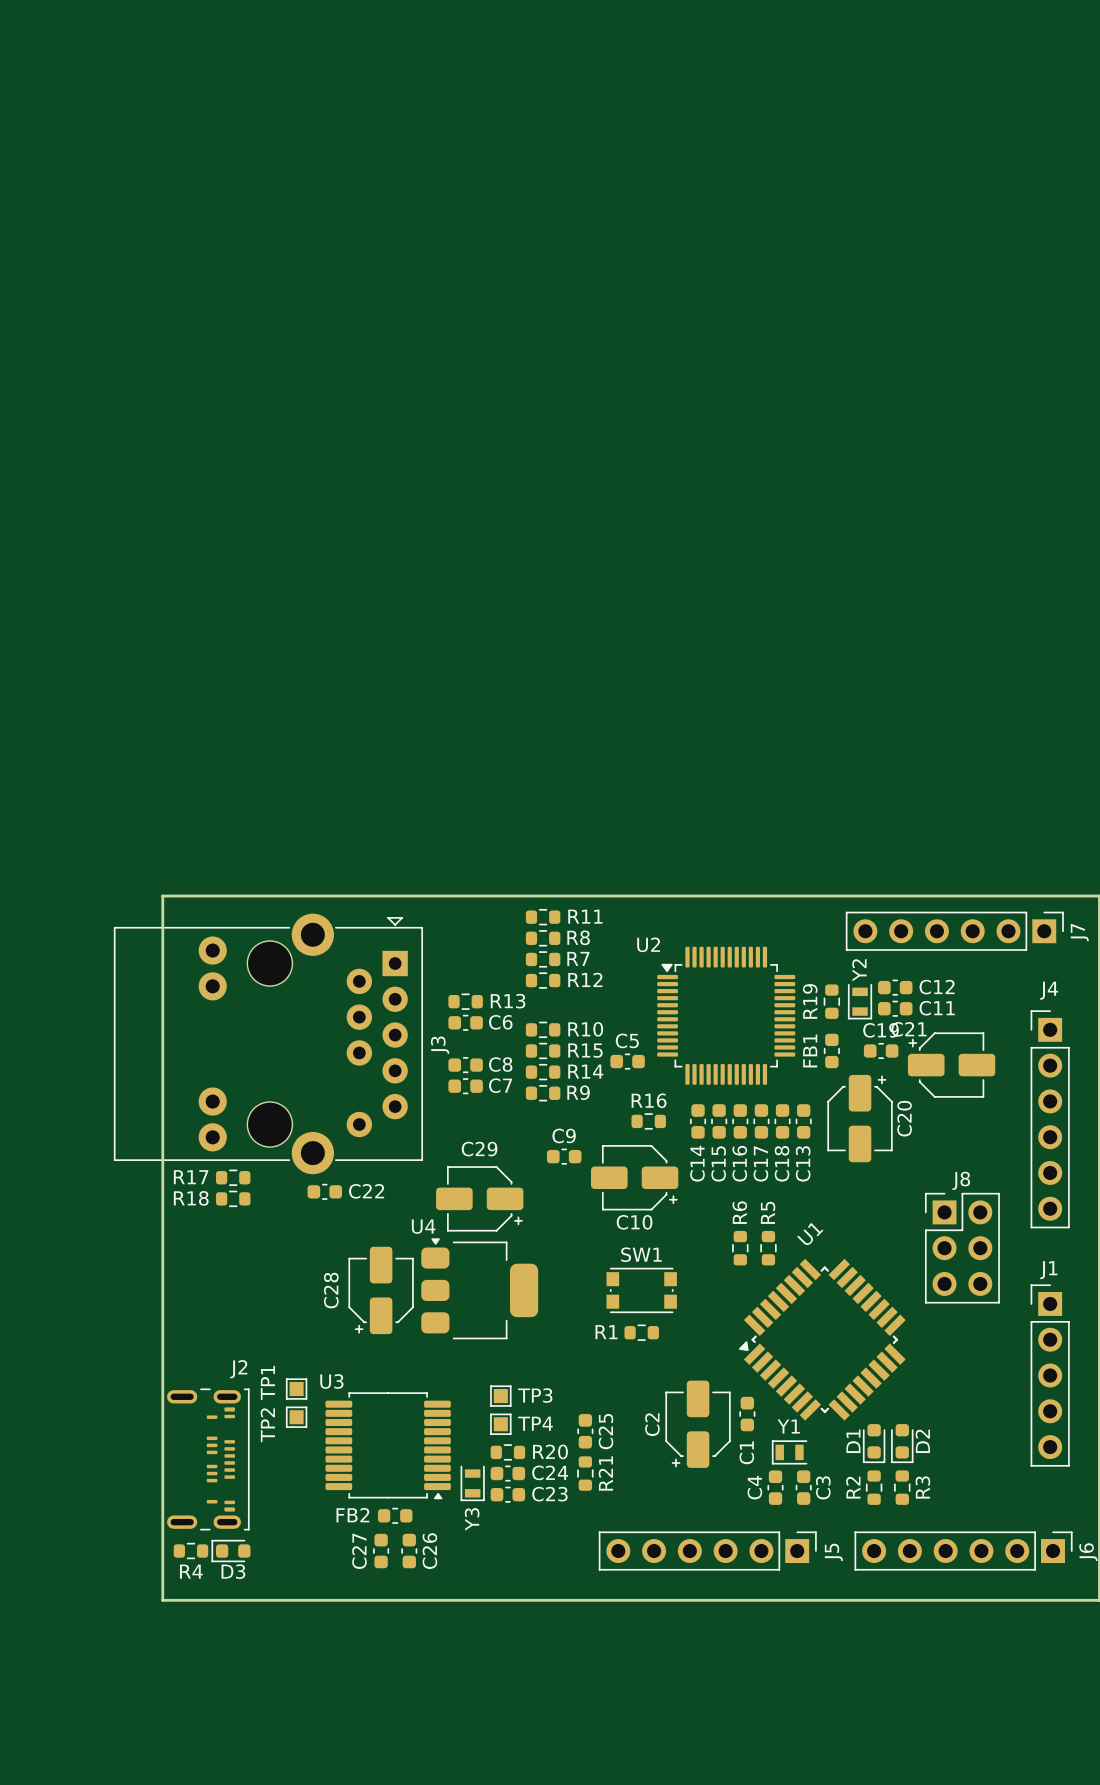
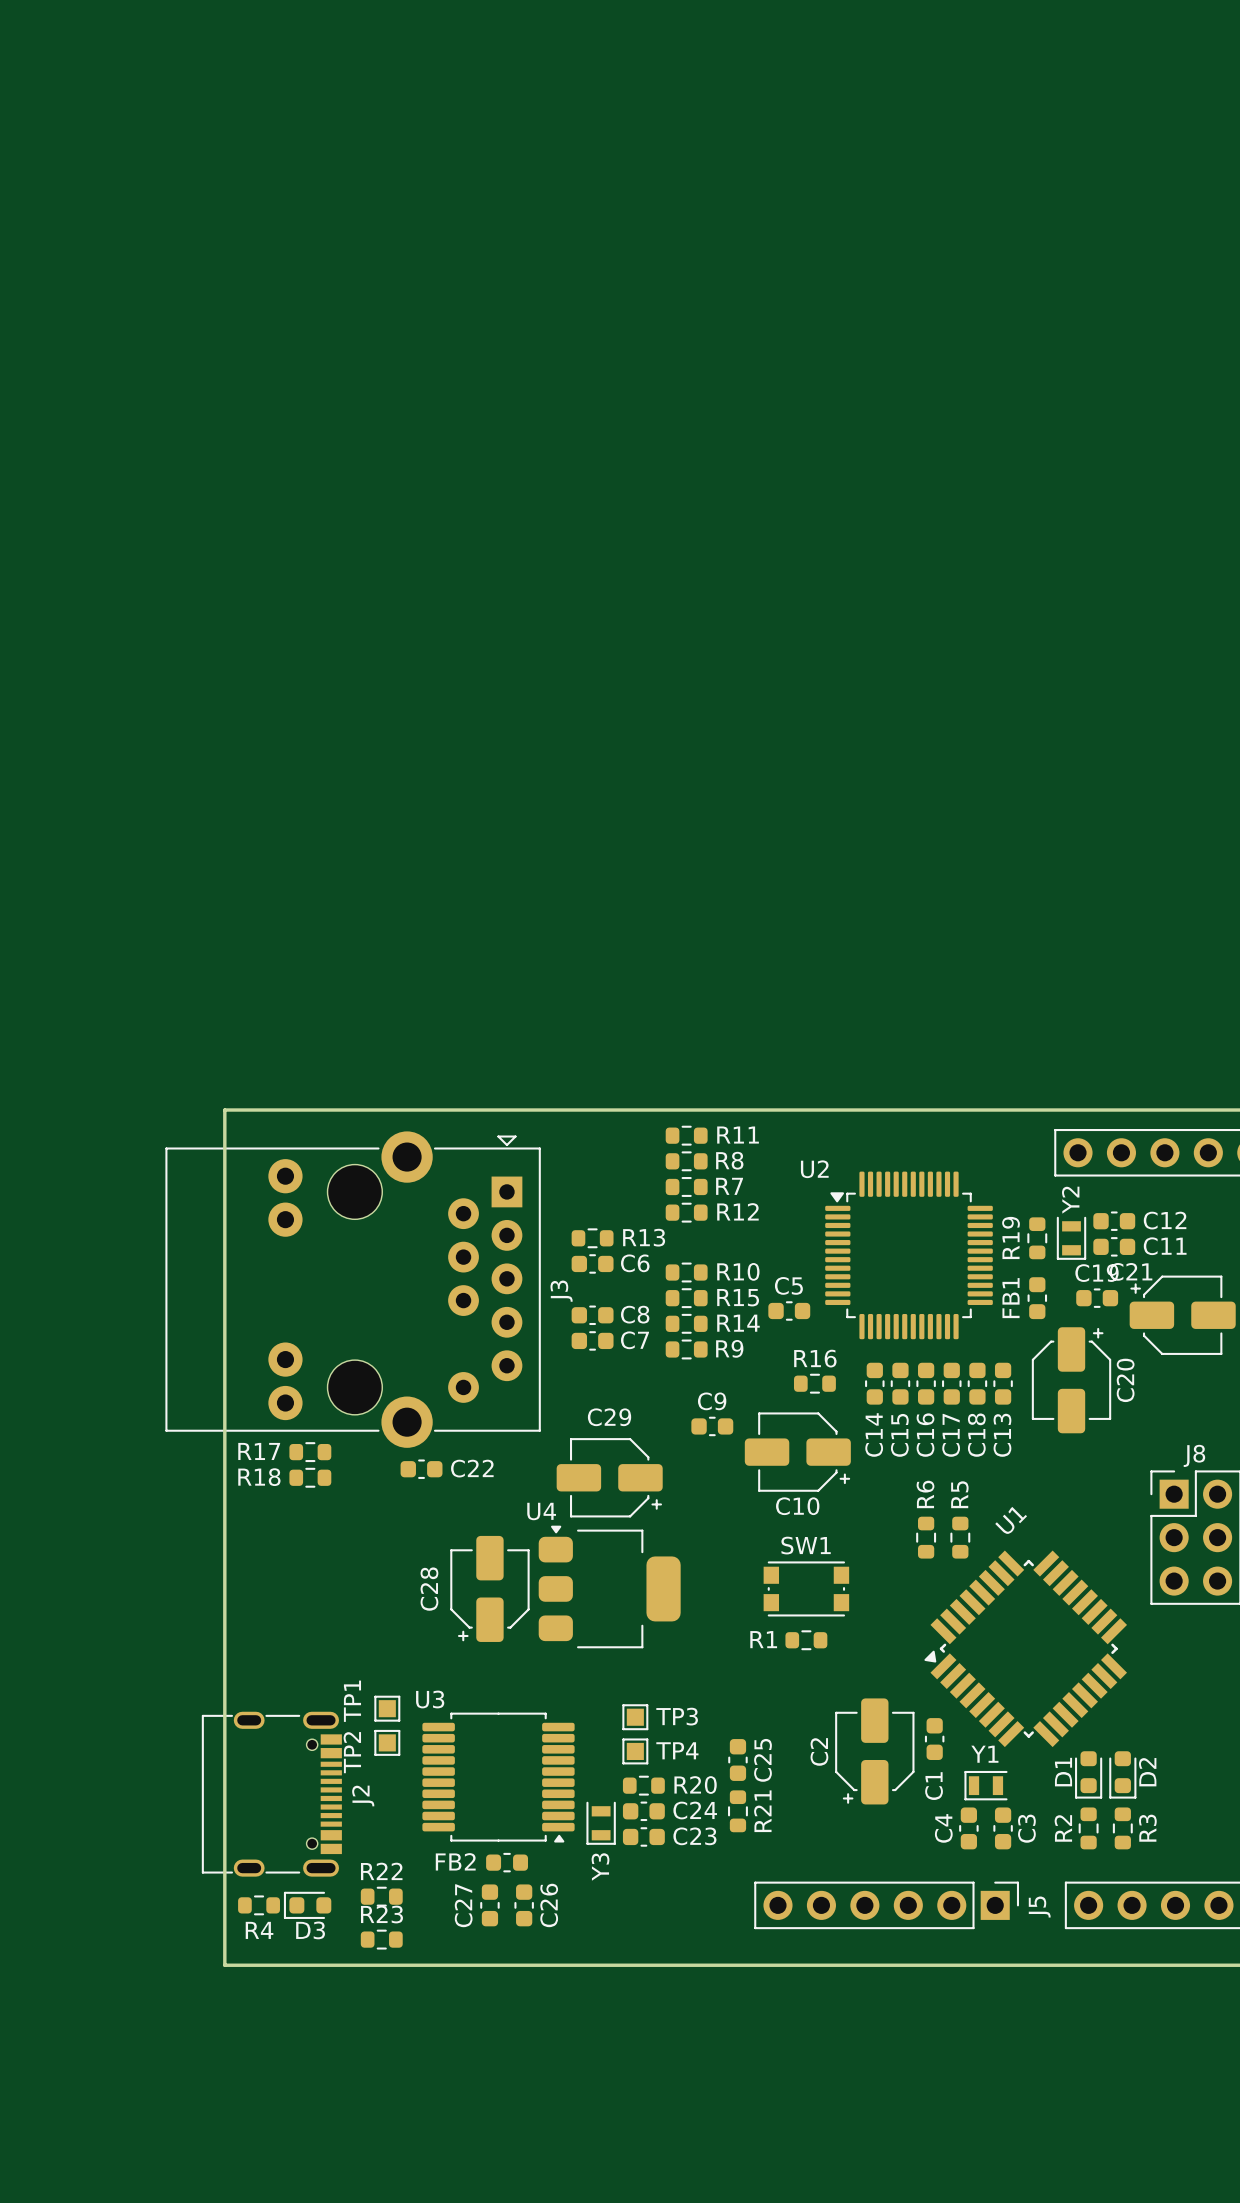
J2 name position: J2 (238, 1369) -> J2 (363, 1795)
J2 footprint: [167, 1388, 250, 1531] -> [201, 1711, 342, 1877]
R22: none -> (381, 1896)
R23: none -> (381, 1939)

